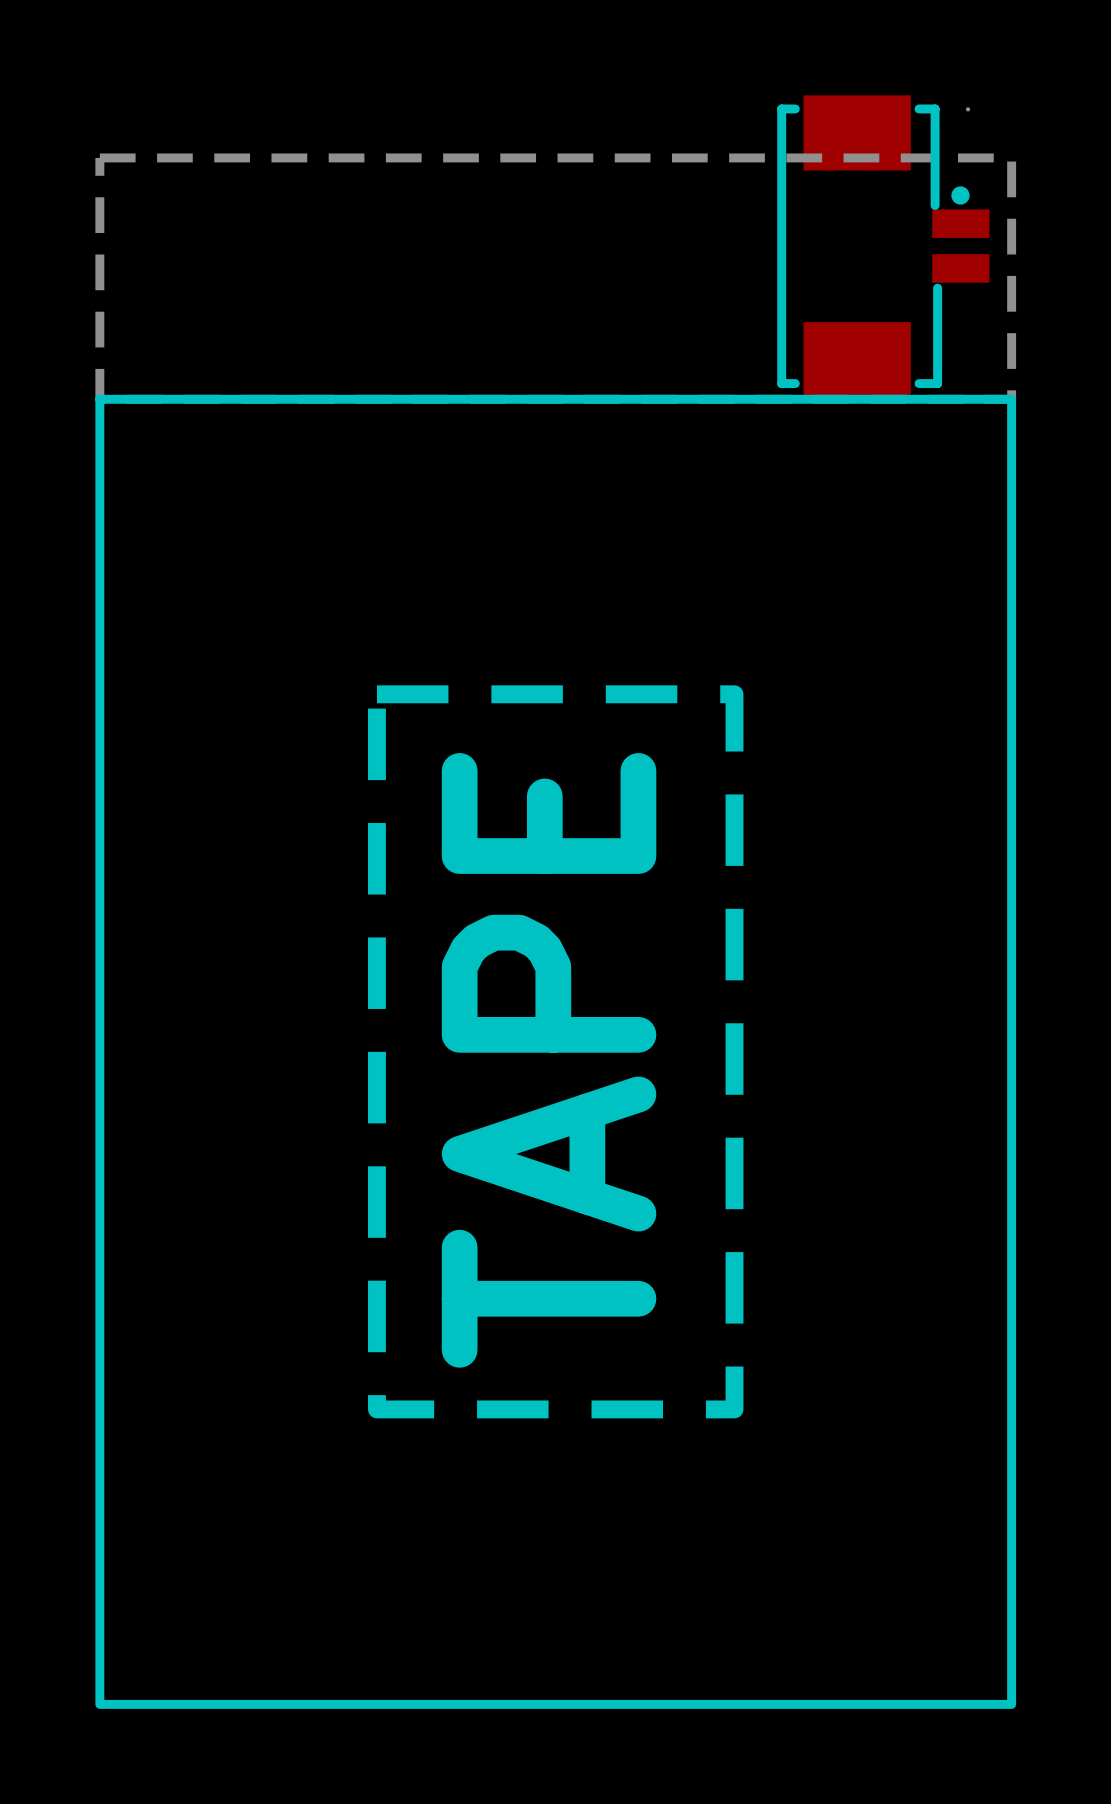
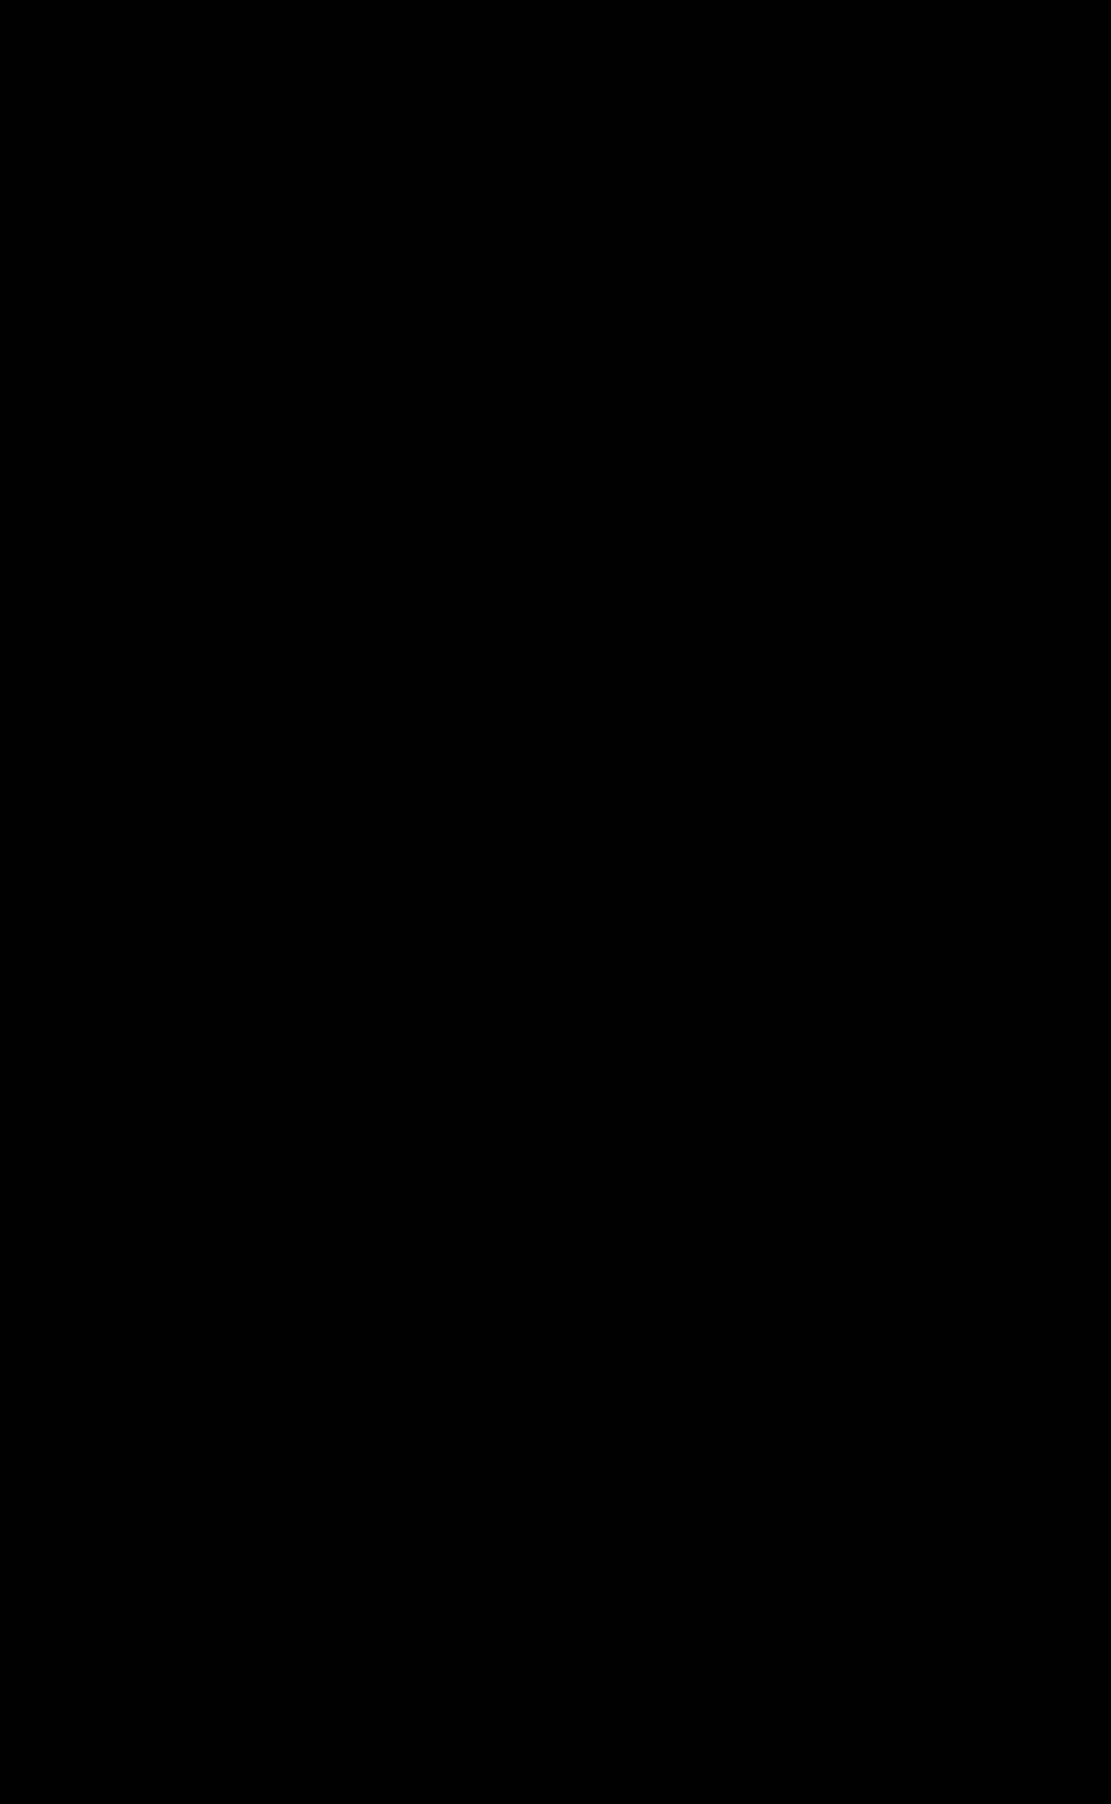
drawing: [95, 153, 1017, 1709] -> none
part: (883, 246) -> none

